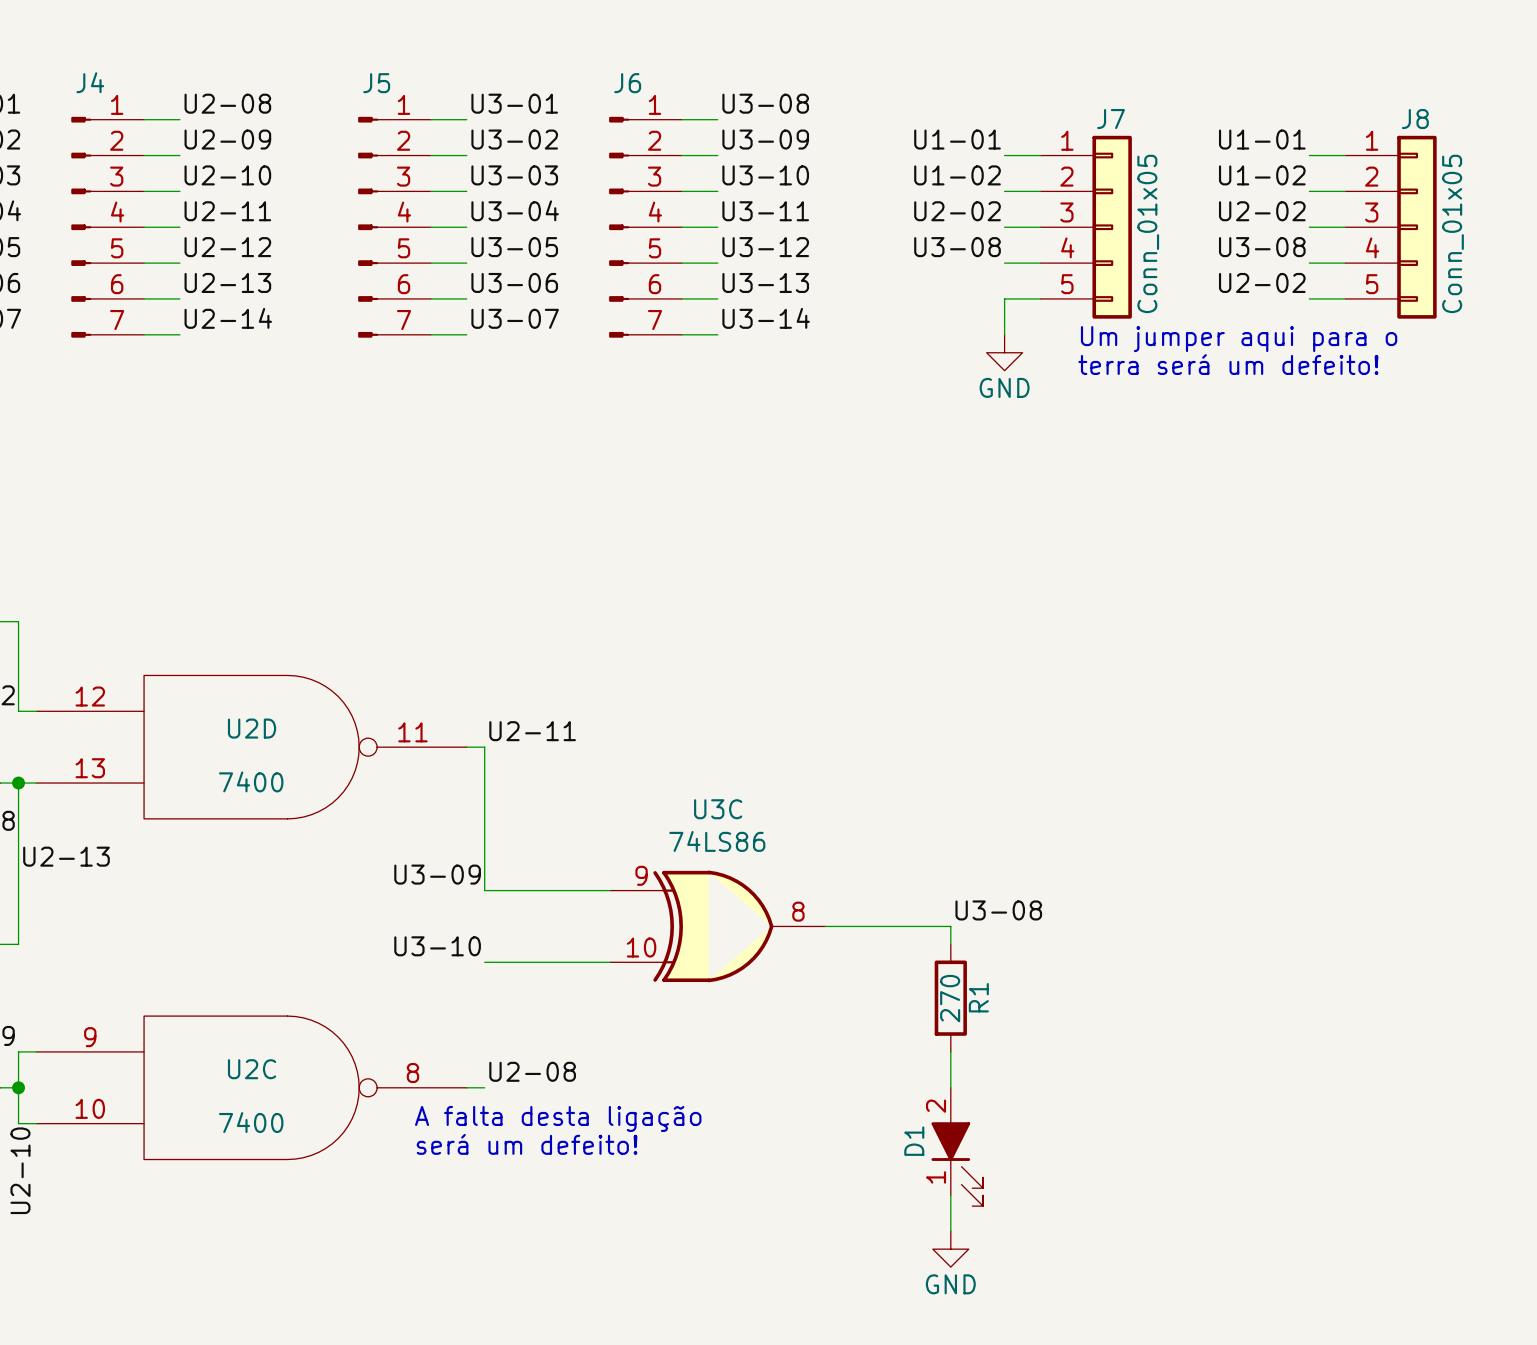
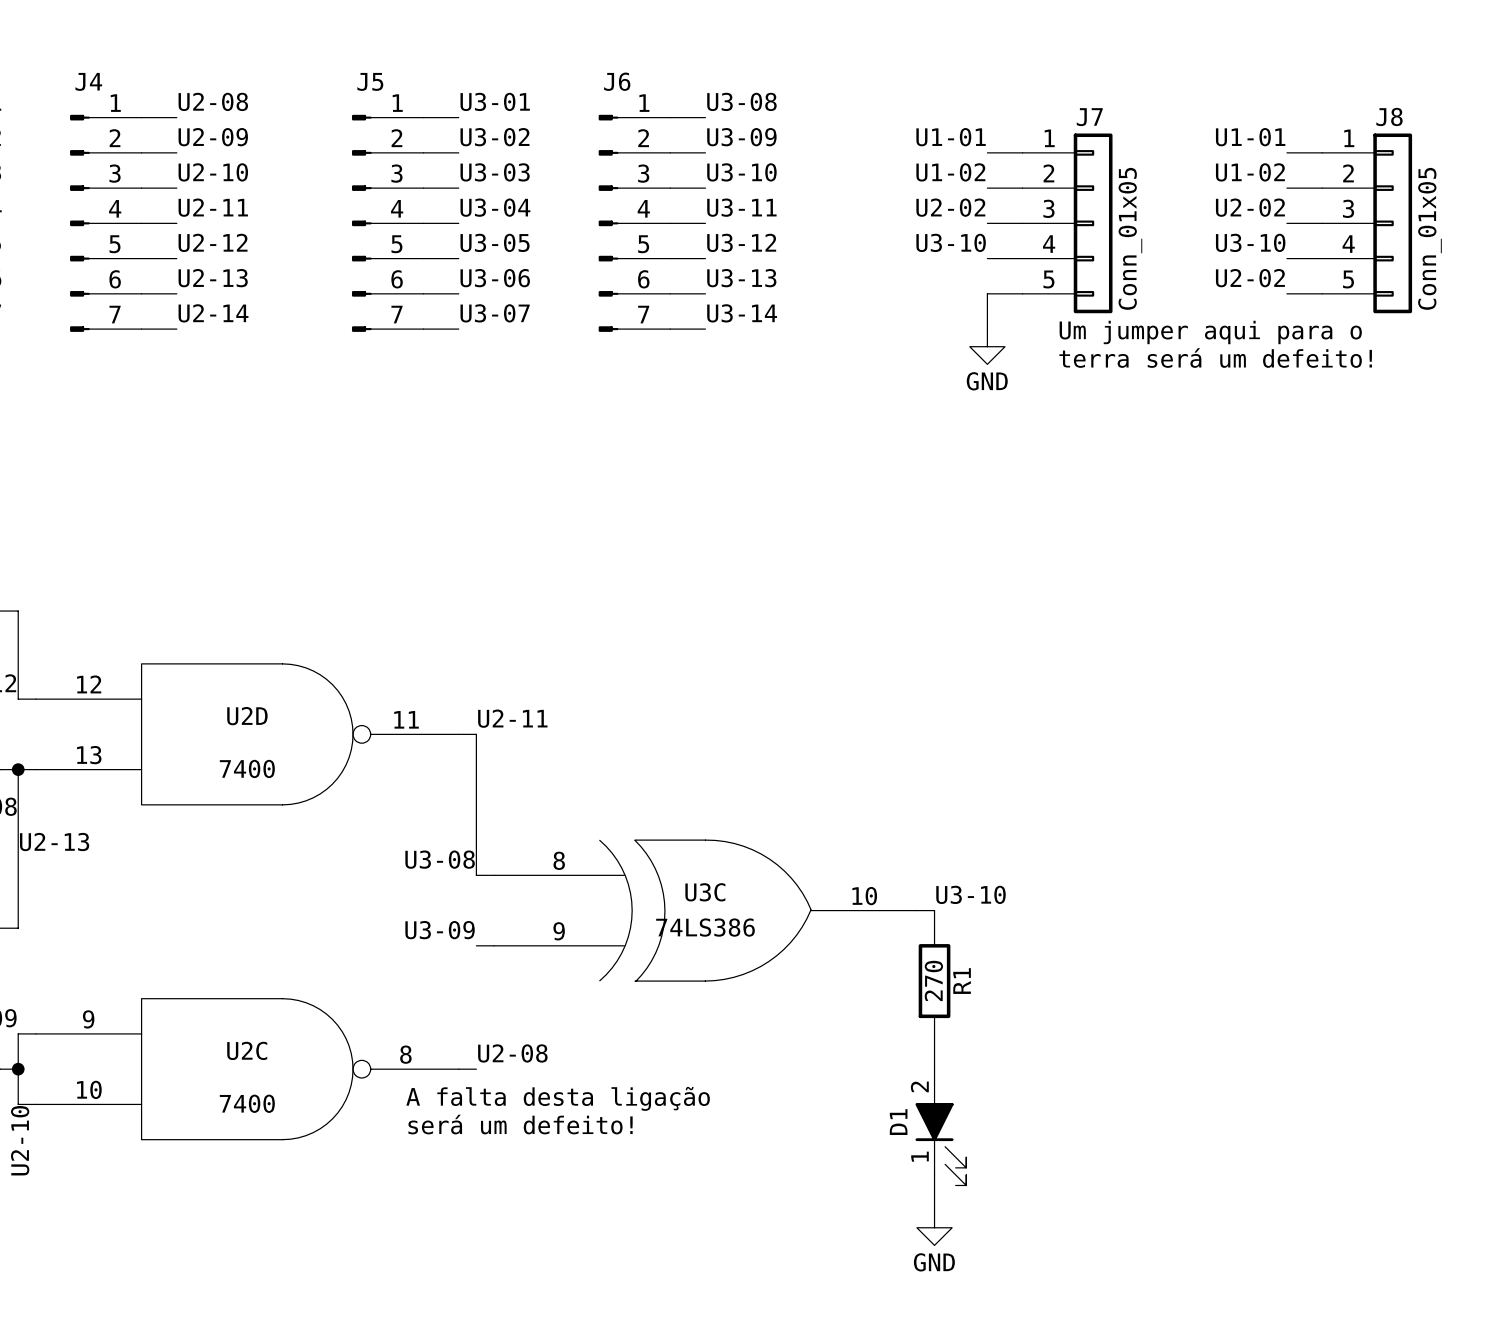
label: U3-08 (957, 247) -> U3-10 (951, 242)
label: U3-08 (1262, 247) -> U3-10 (1250, 242)
U3C name position: U3C (718, 809) -> U3C (705, 892)
U3C value: 74LS86 (717, 841) -> 74LS386 (705, 927)
U3C symbol: [610, 870, 826, 983] -> [494, 840, 917, 982]
label: U3-09 (437, 874) -> U3-08 (440, 859)
label: U3-08 (998, 910) -> U3-10 (971, 894)
label: U3-10 (437, 946) -> U3-09 (440, 930)

